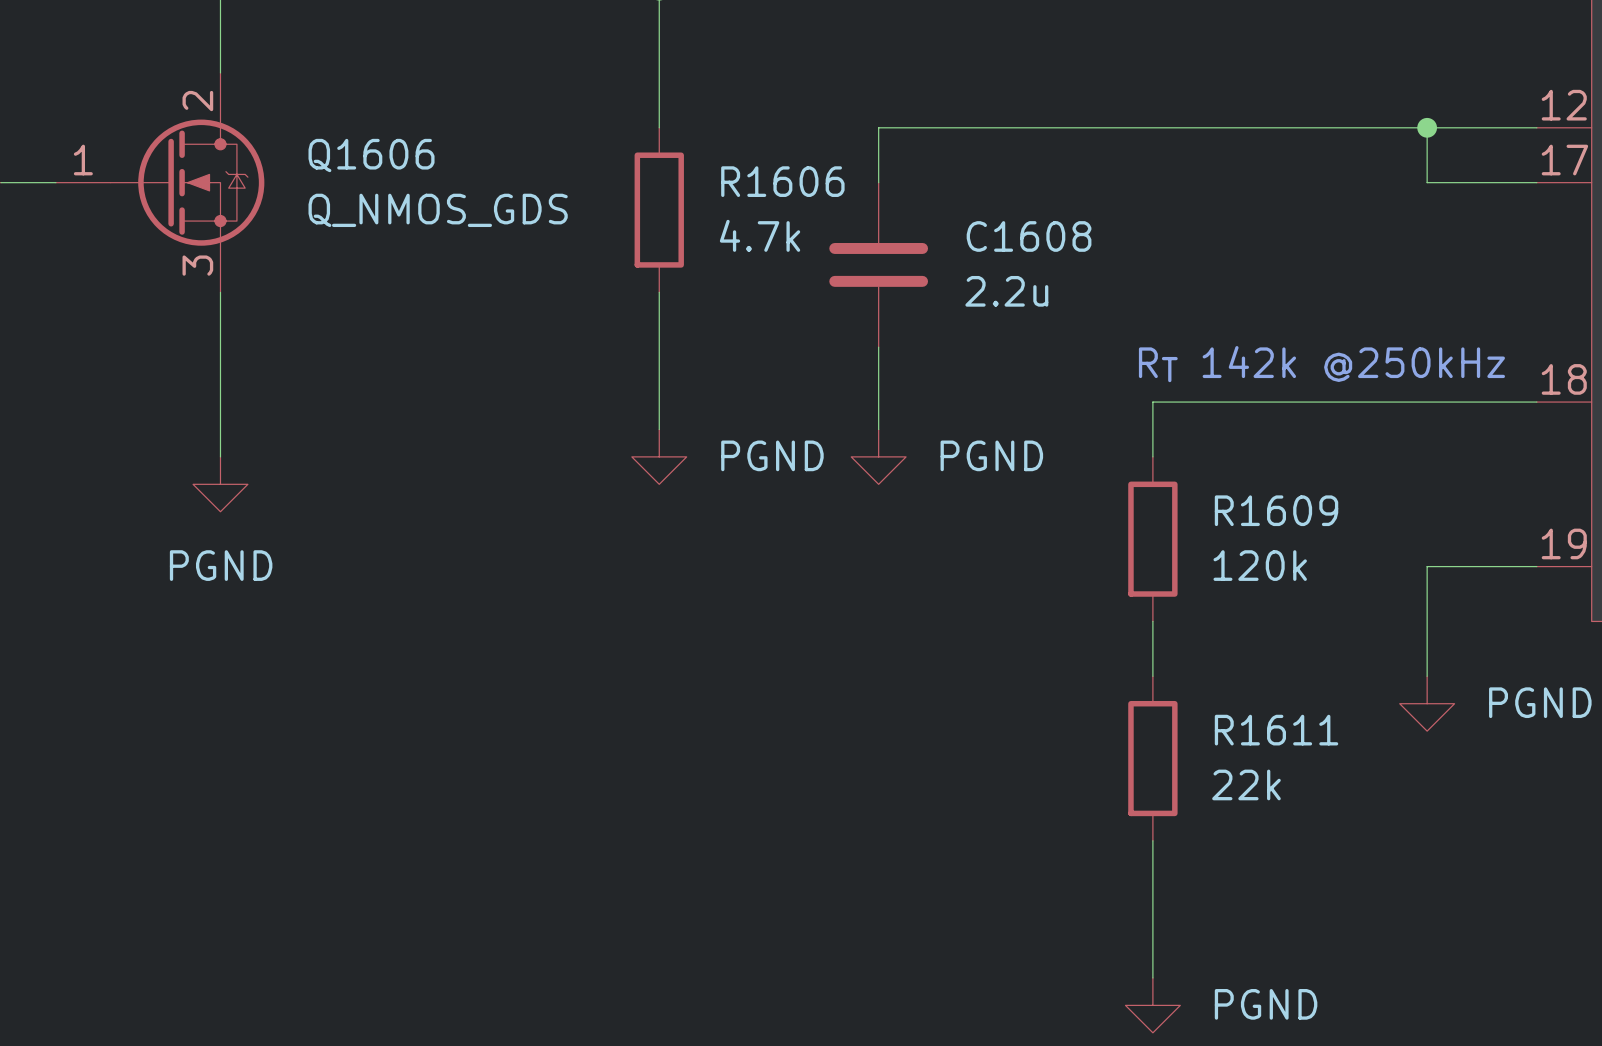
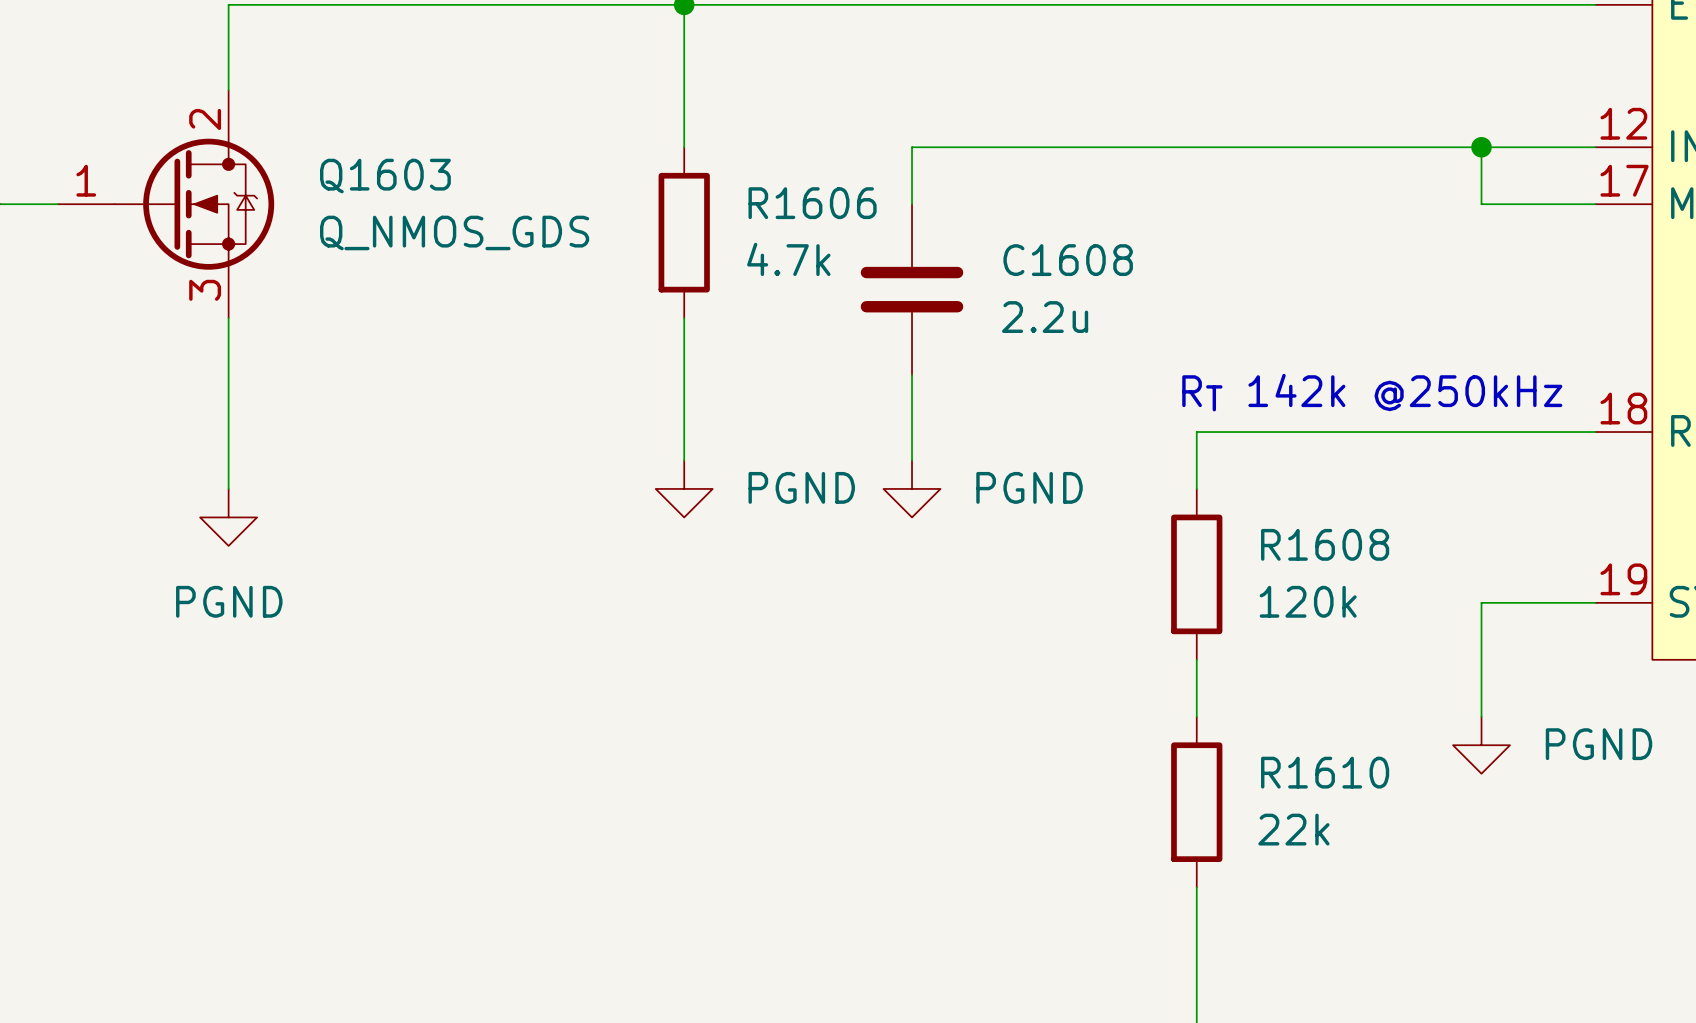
Q1606 name: Q1606 (371, 155) -> Q1603 (385, 176)
R1609 name: R1609 (1276, 510) -> R1608 (1325, 544)
R1611 name: R1611 (1276, 730) -> R1610 (1325, 772)

